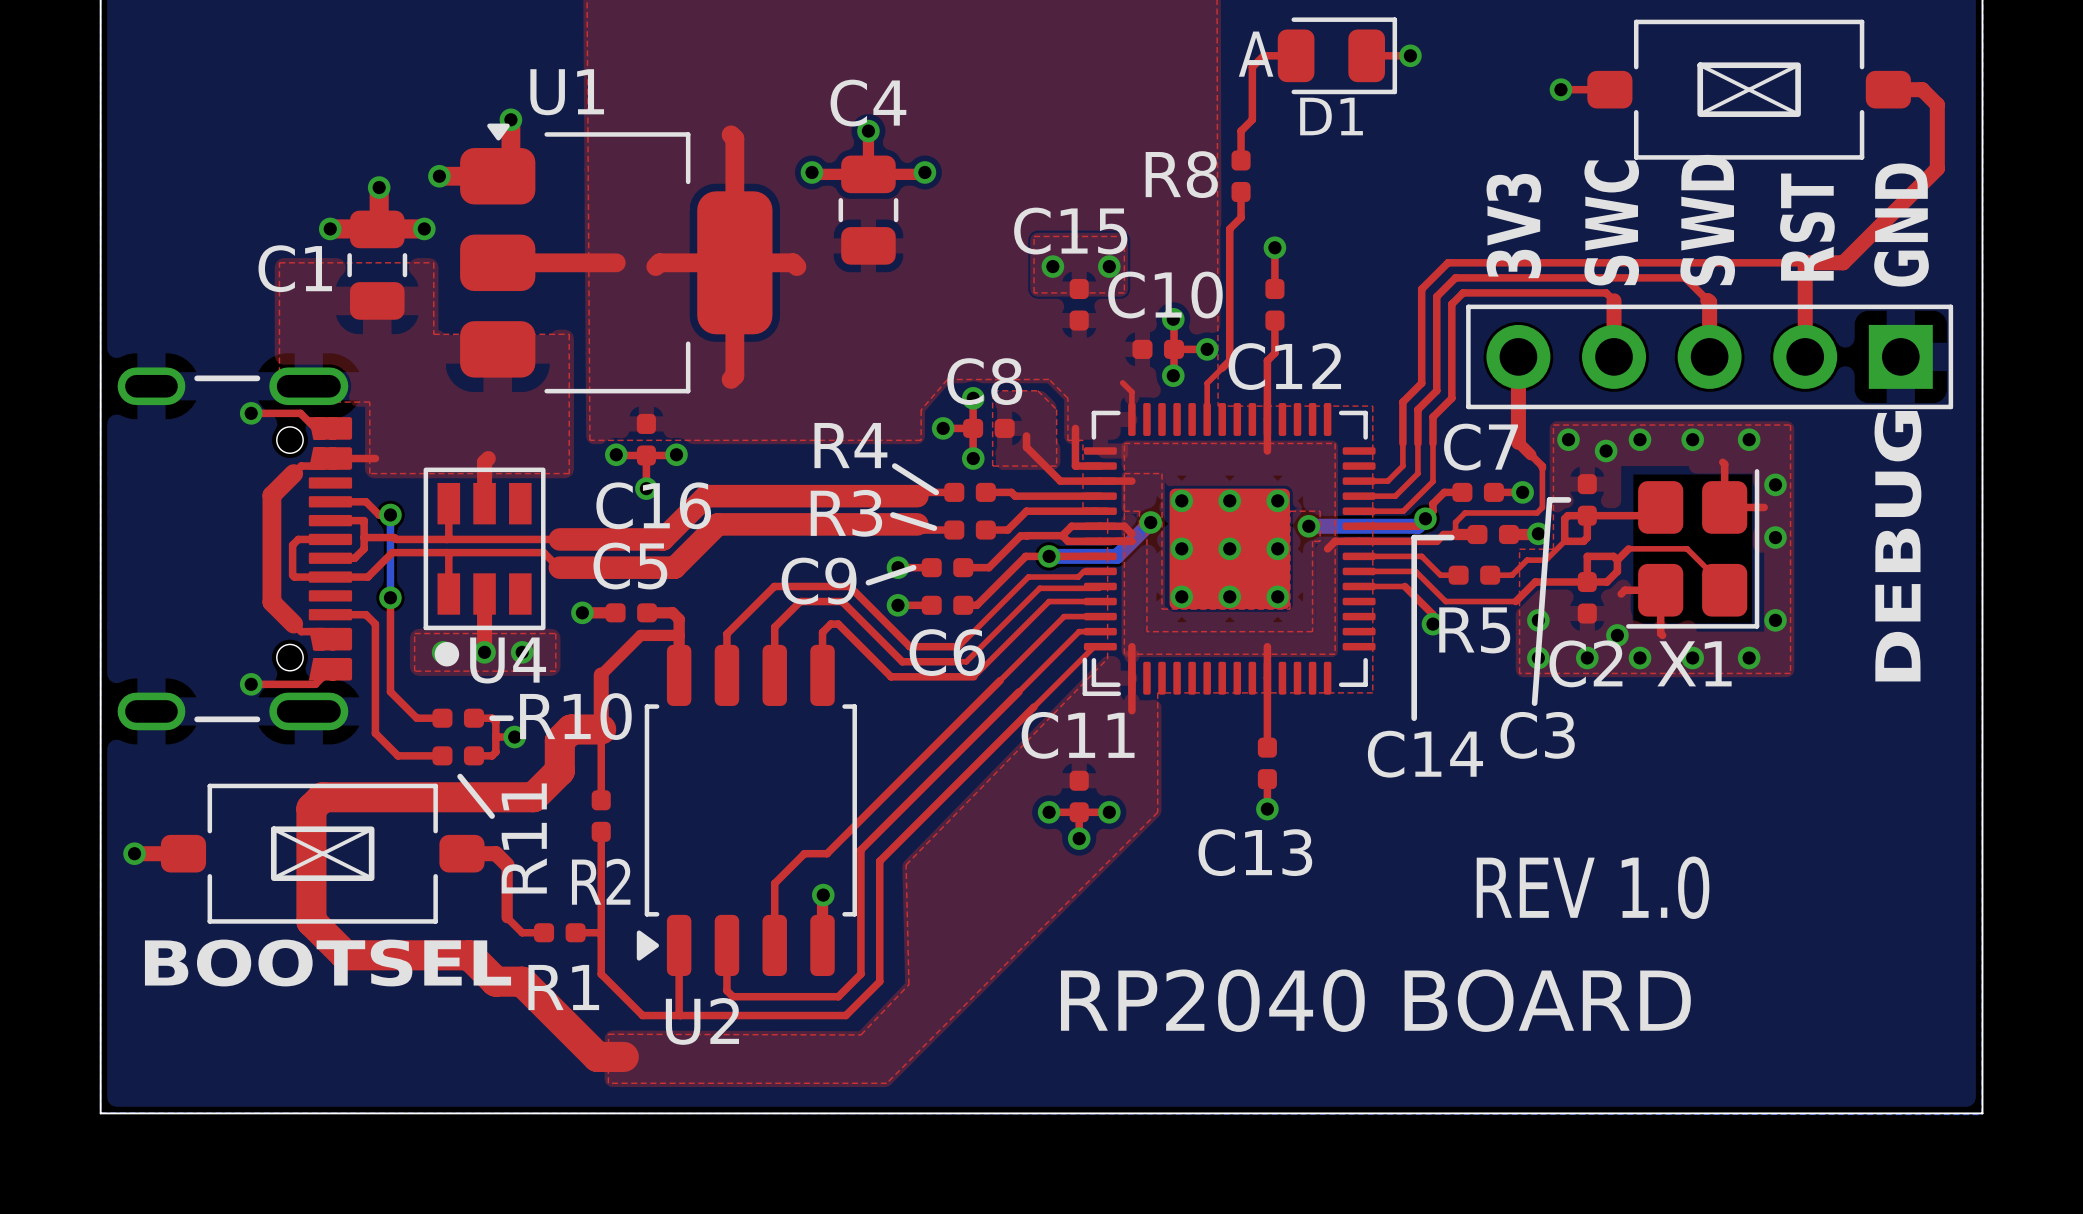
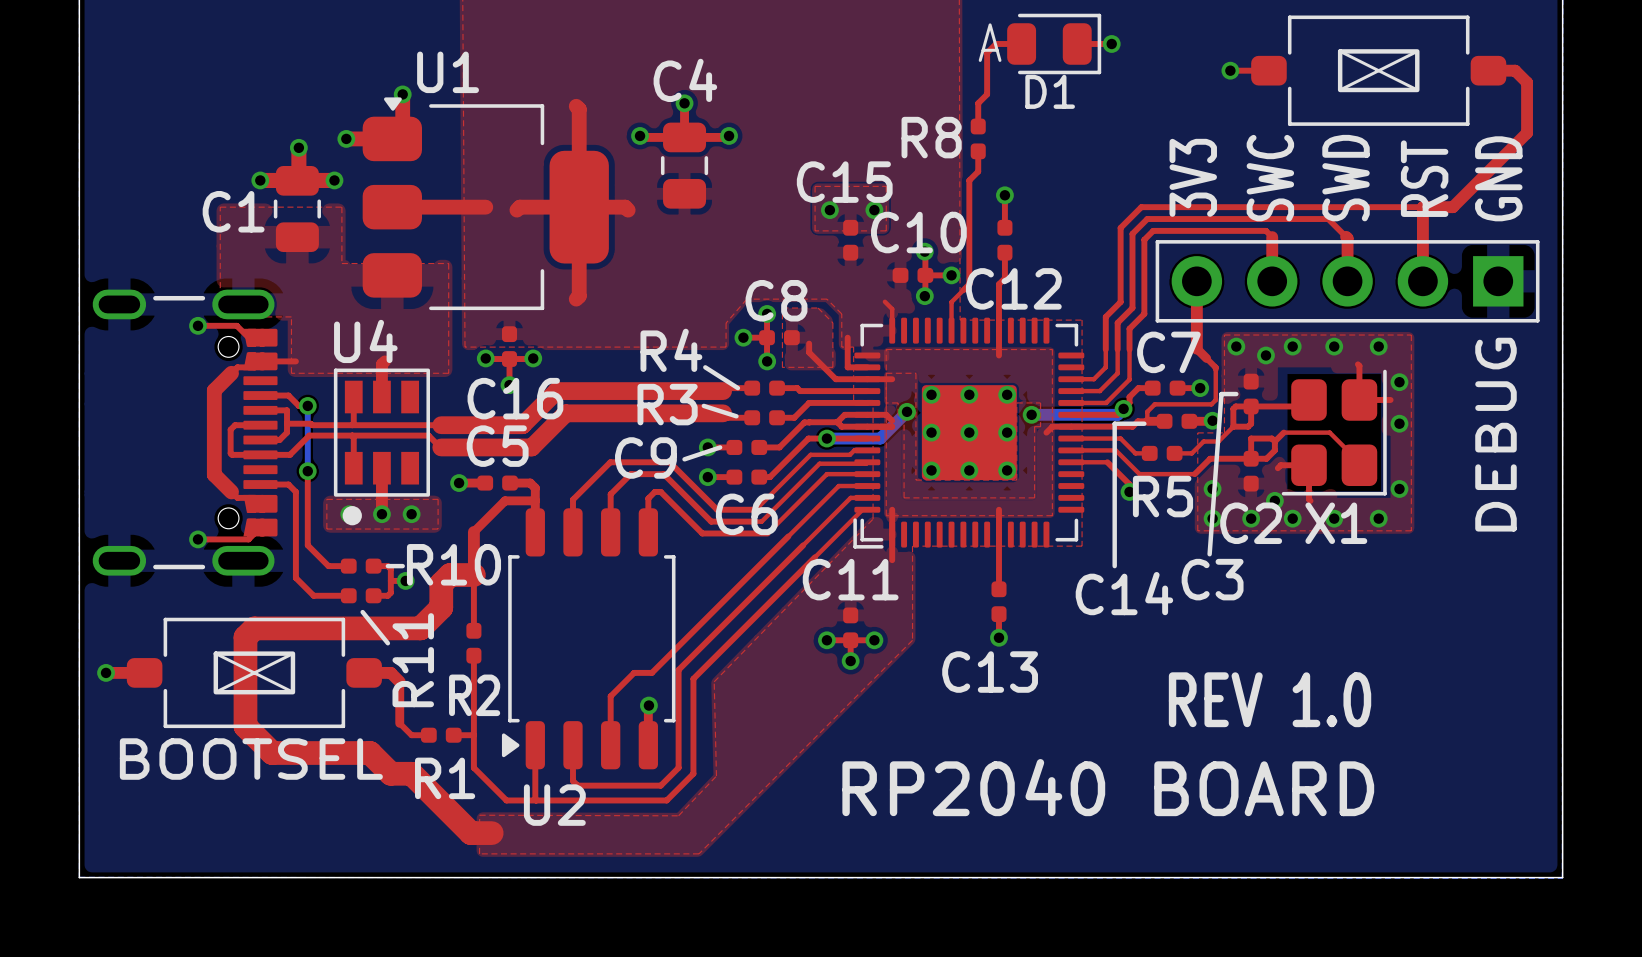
U4 name position: U4 (508, 660) -> U4 (365, 341)

